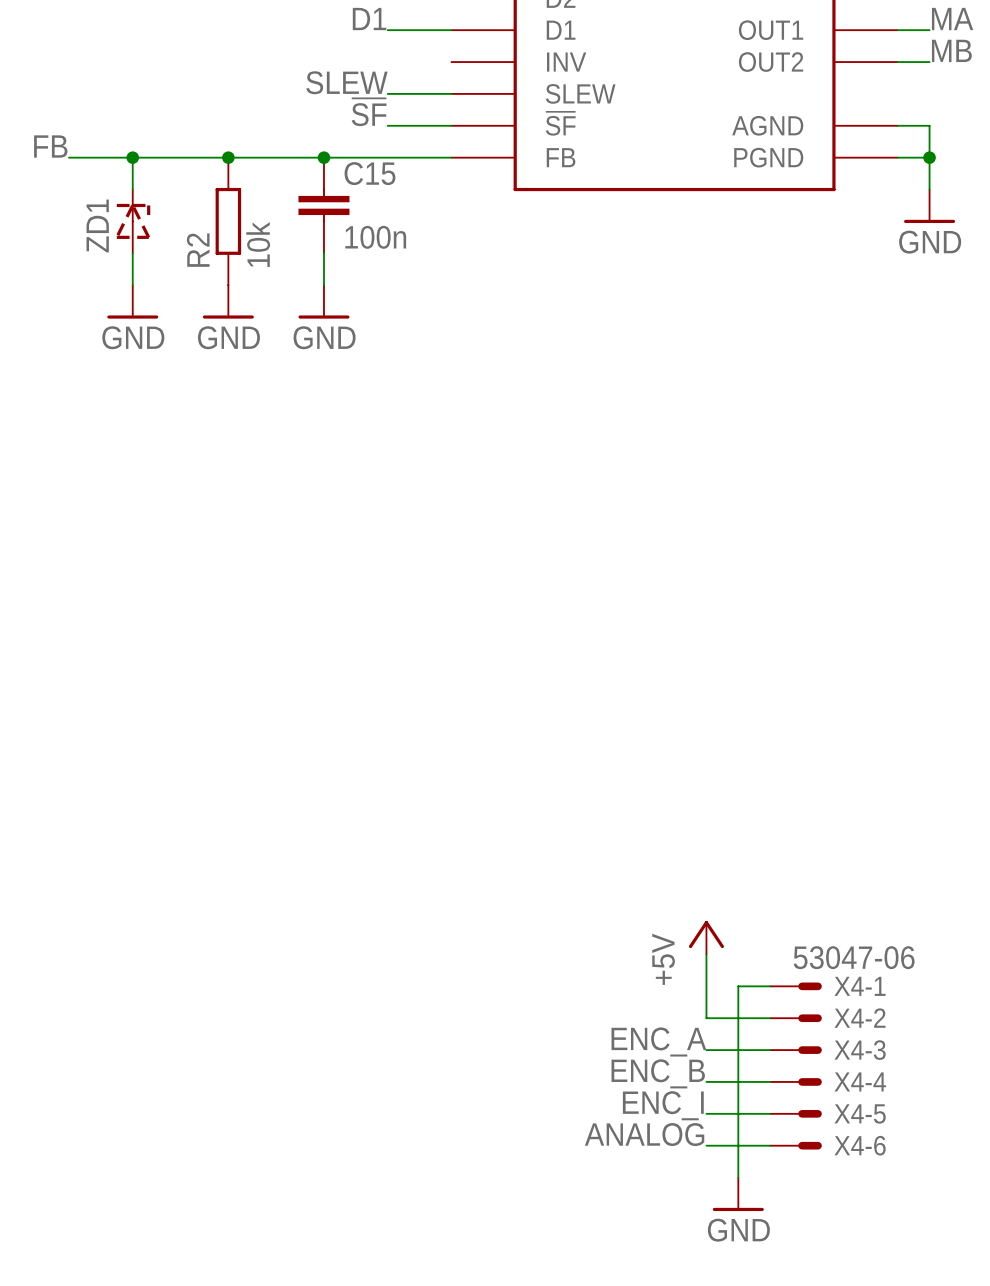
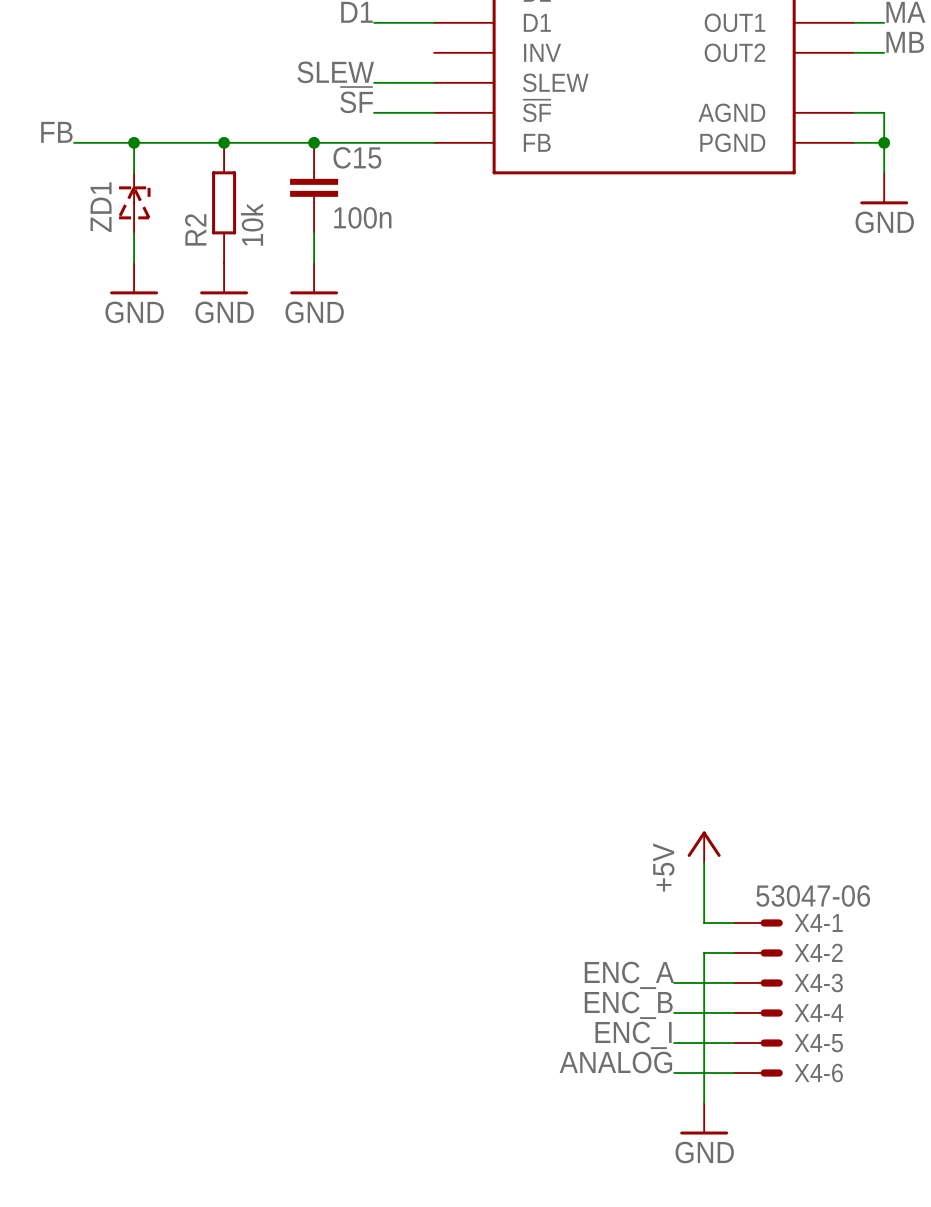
power symbol position: +5V (706, 937) -> +5V (704, 847)
wire: (706, 954) (706, 1018) (738, 1018) (738, 986) -> (704, 862) (704, 922)

